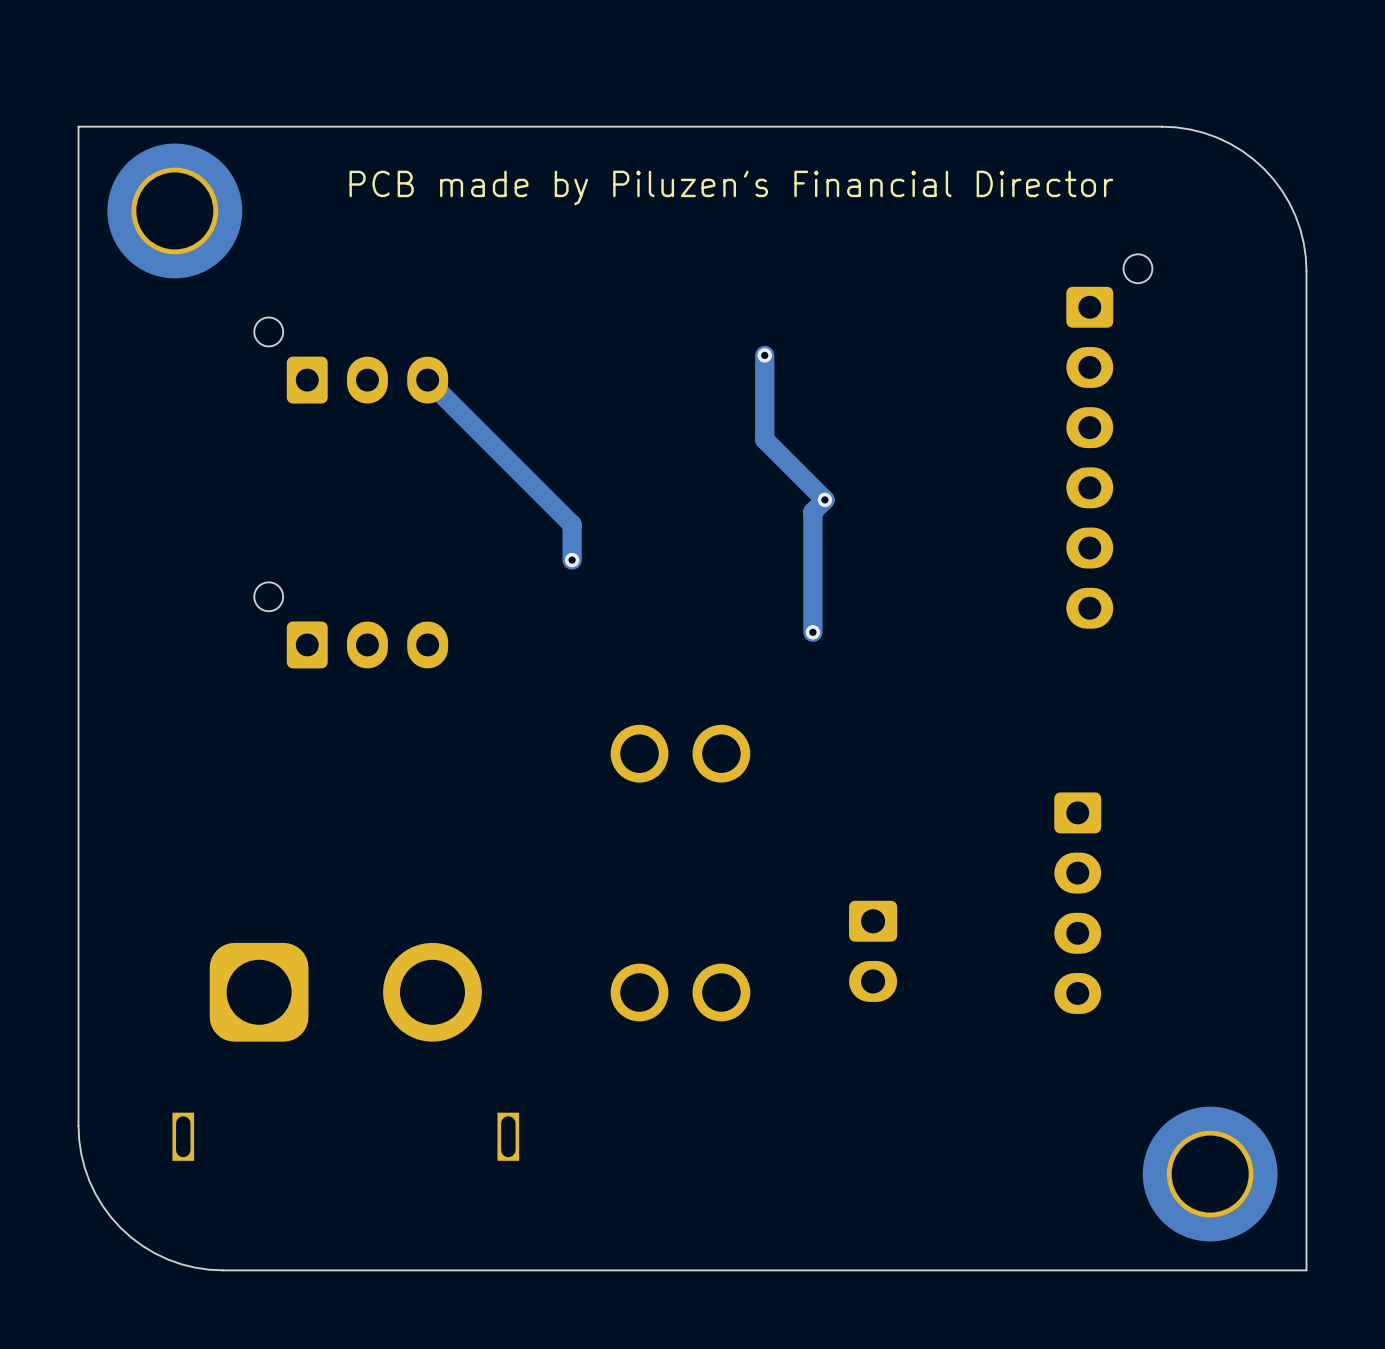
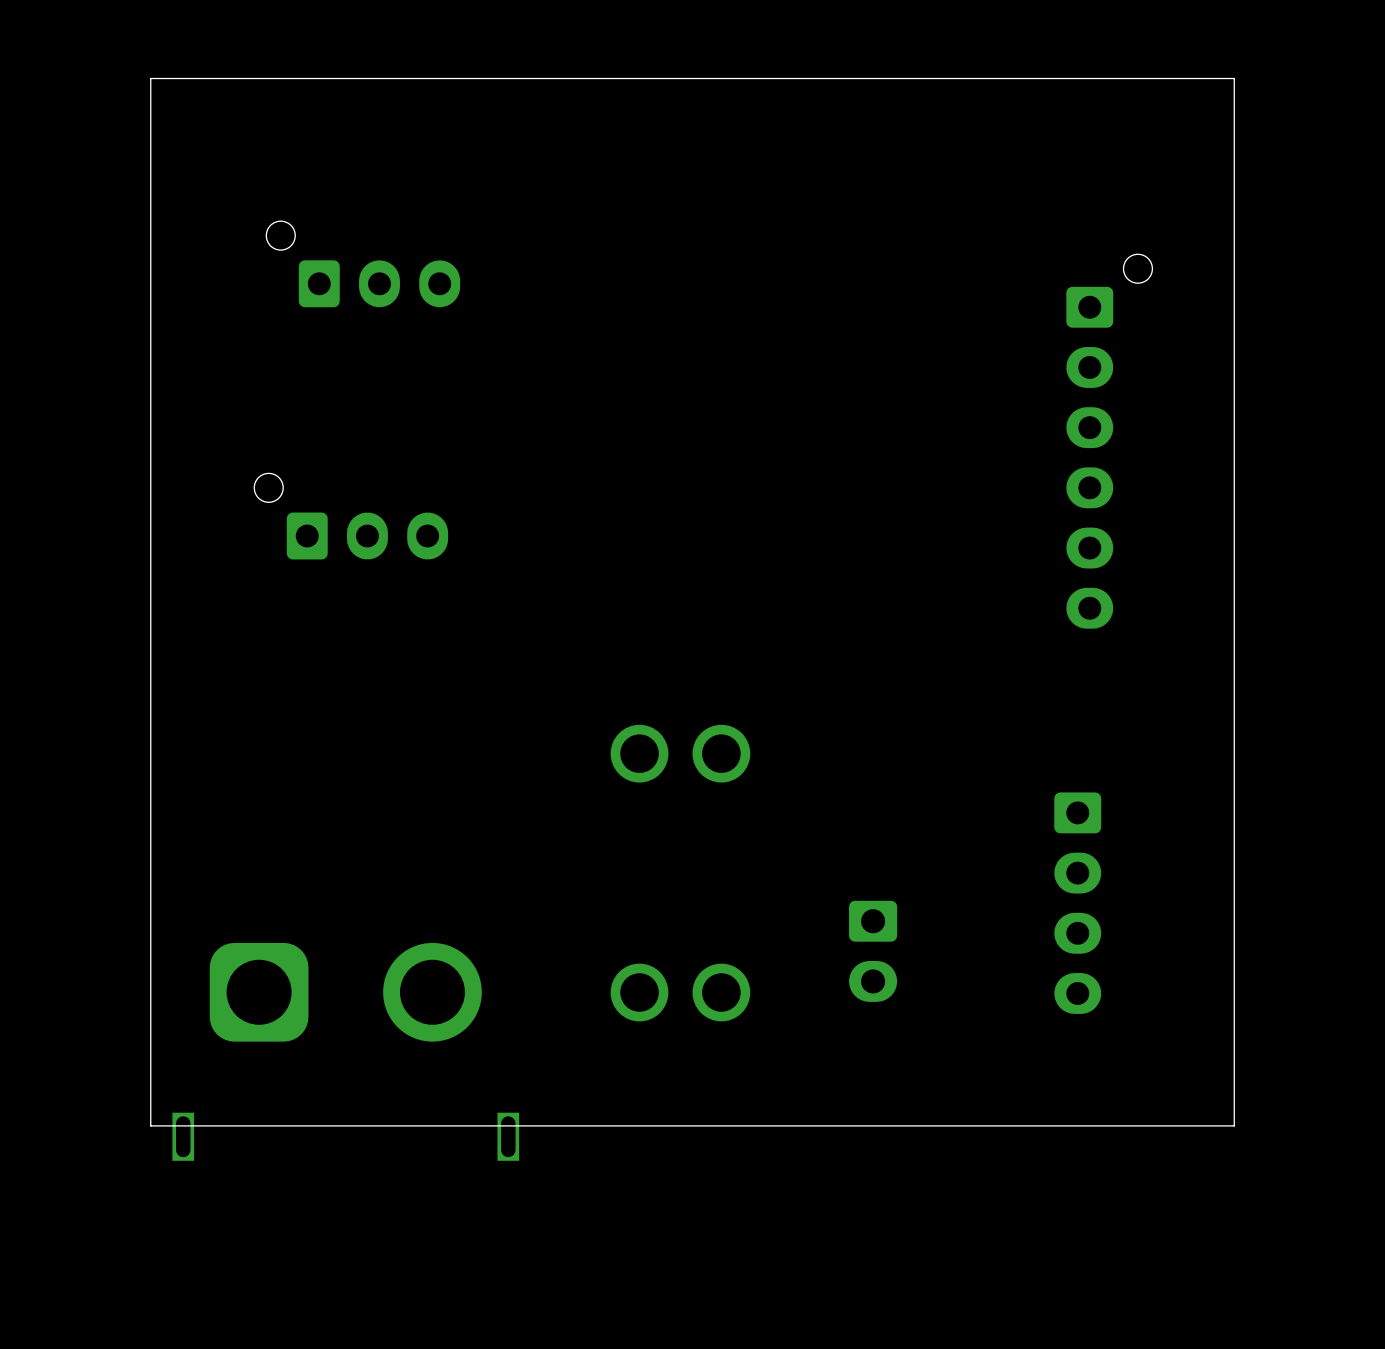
board edge: (1162, 126) (78, 126) (78, 1125) (81, 1154) (89, 1181) (102, 1206) (120, 1228) (142, 1246) (167, 1259) (194, 1267) (222, 1270) (1306, 1270) (1305, 256) (1300, 229) (1289, 203) (1264, 168) (1242, 151) (1217, 137) (1190, 129) (1162, 126) -> (1234, 78) (1234, 1125) (150, 1125) (150, 78) (1234, 78)
text: PCB made by Piluzen's Financial Director (731, 187) -> none
part: (174, 210) -> none
part: none -> (363, 264)
track: (764, 355) (764, 439) (824, 499) (812, 511) (812, 632) -> none
via: (764, 355) -> none
part: (351, 360) -> none
track: (427, 380) (572, 524) (572, 560) -> none
via: (824, 499) -> none
part: none -> (351, 516)
via: (572, 560) -> none
part: (351, 625) -> none
via: (812, 632) -> none
part: (1210, 1174) -> none

